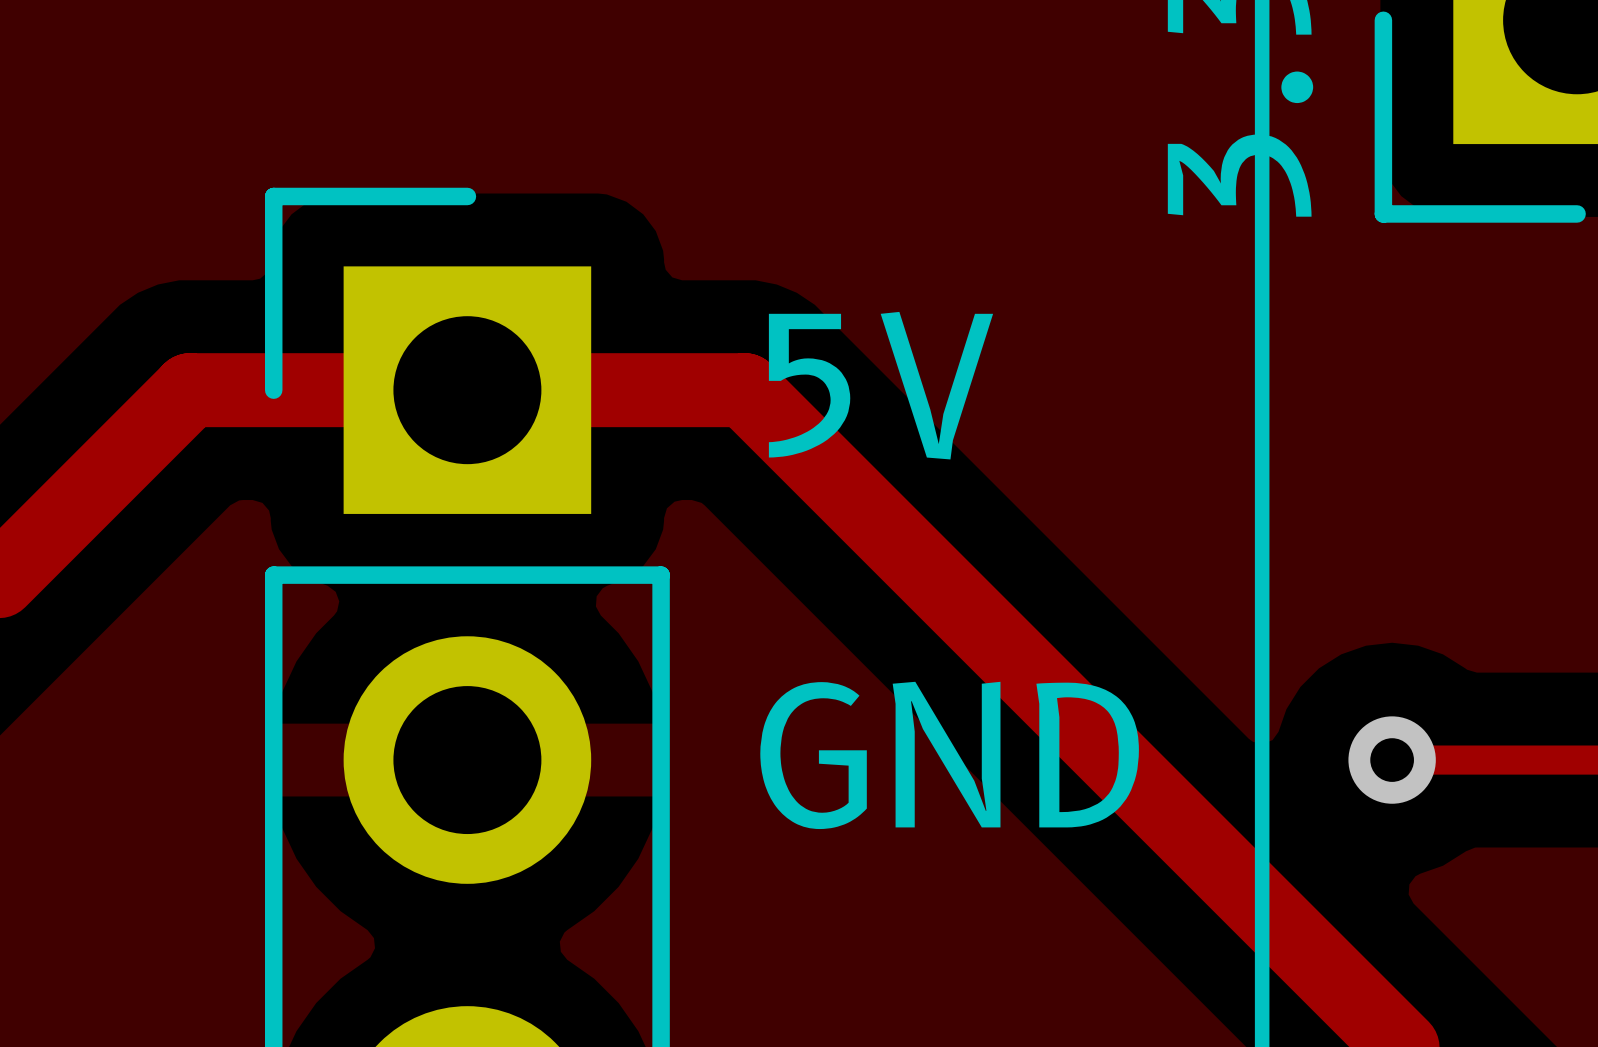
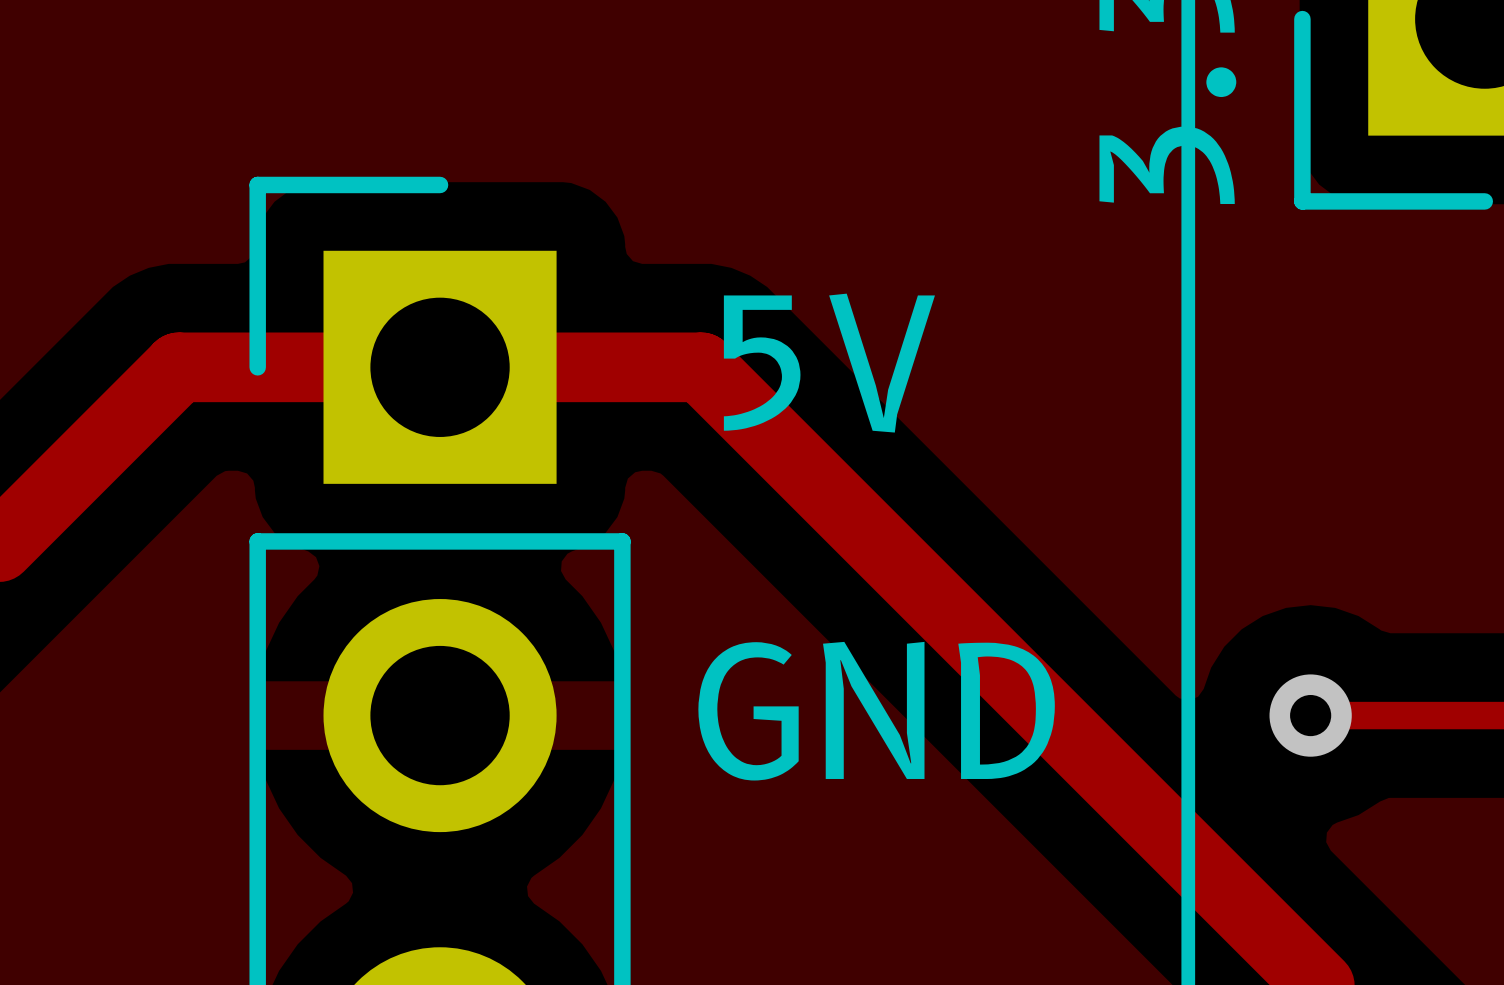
text position: GND (949, 755) -> GND (876, 711)

